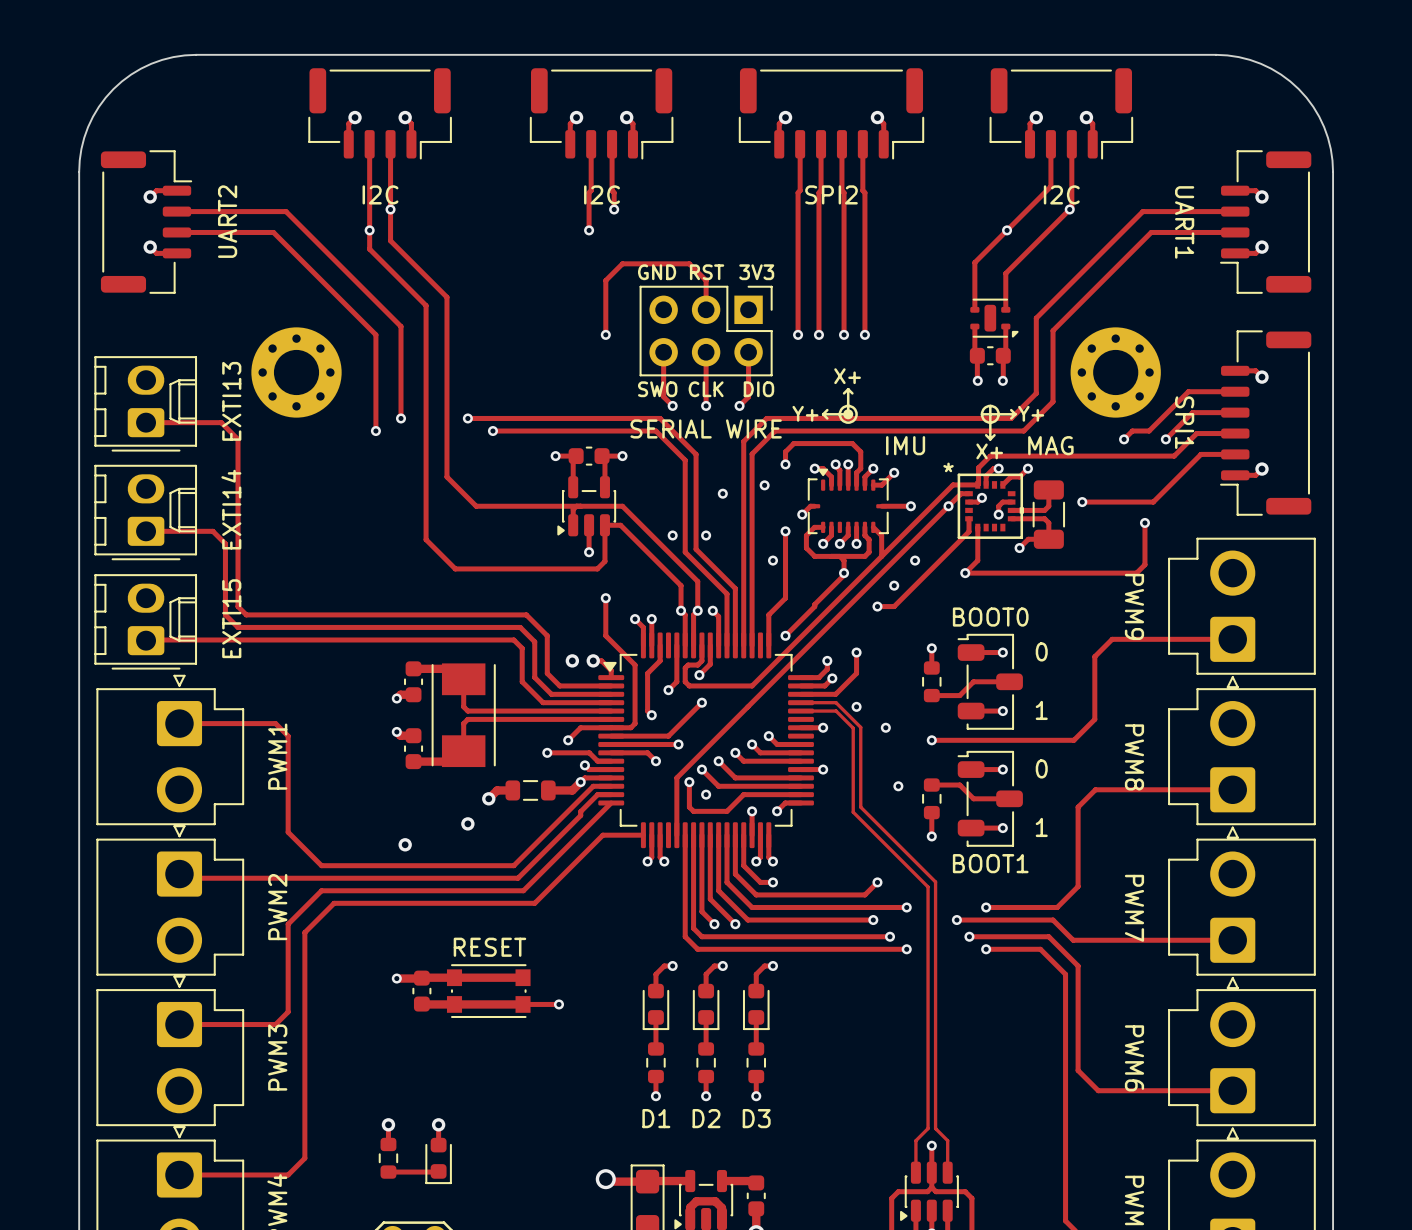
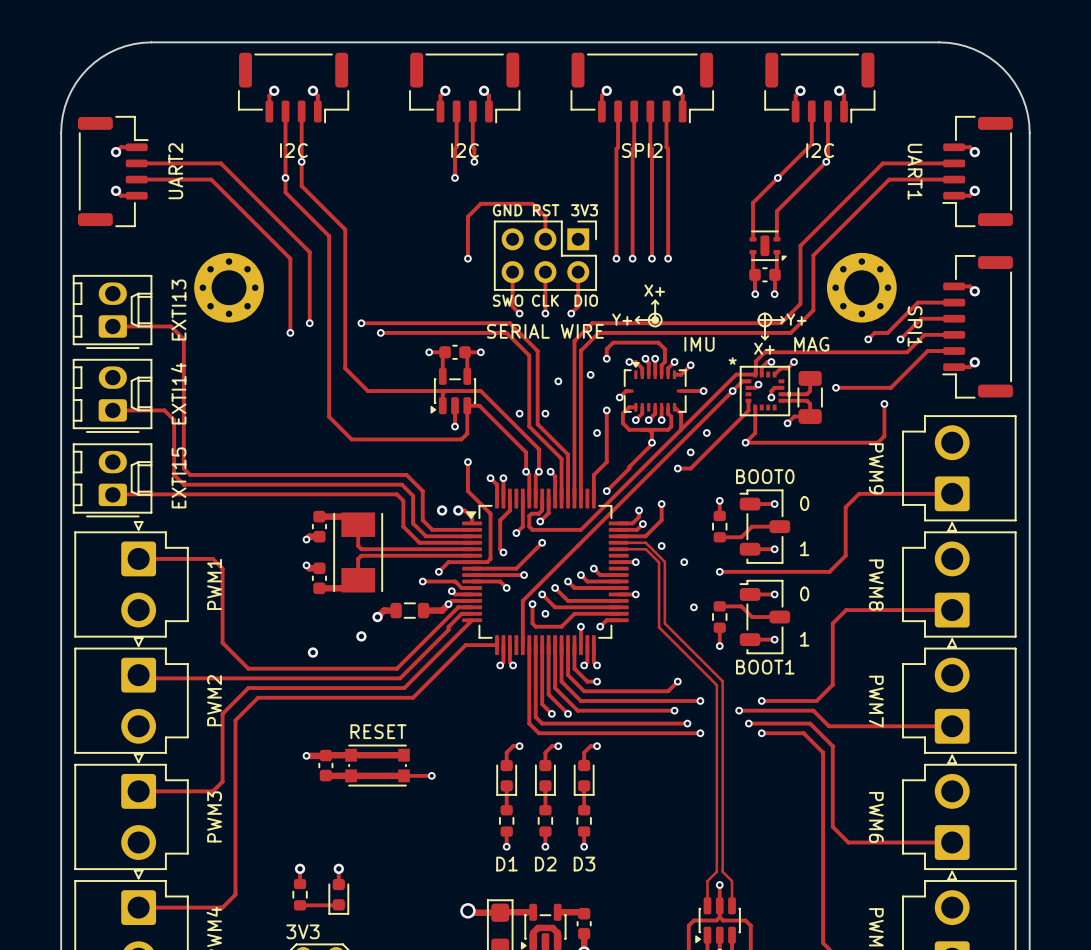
text: none -> 3V3 (302, 931)

